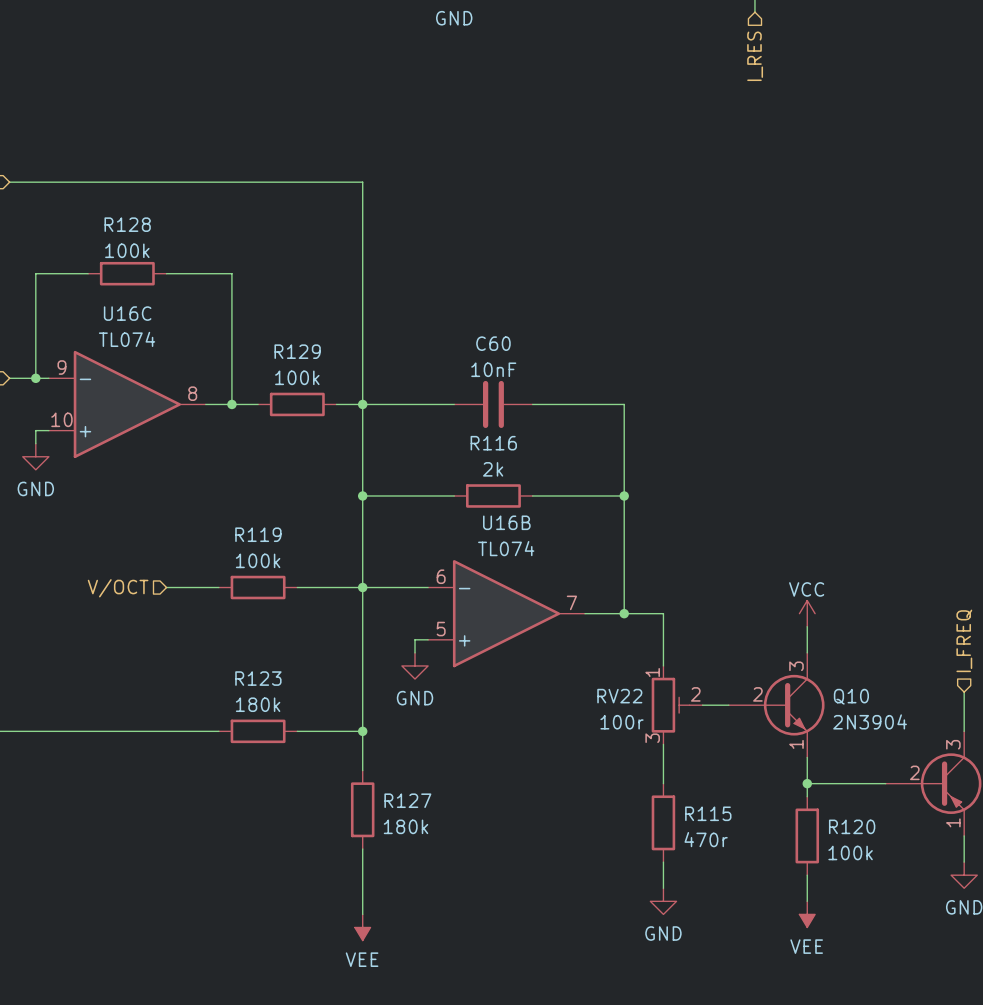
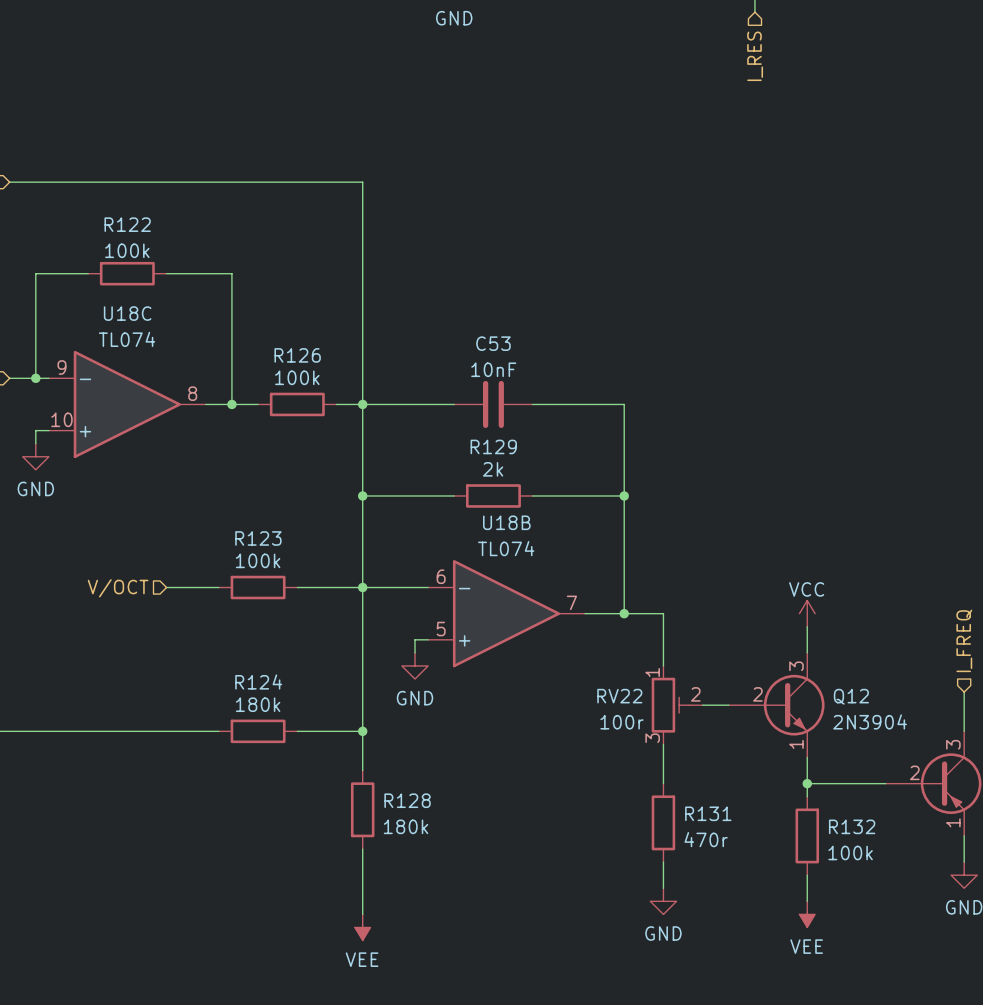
R128 name: R128 (127, 224) -> R122 (127, 224)
U16C name: U16C (127, 313) -> U18C (127, 313)
C60 name: C60 (493, 343) -> C53 (493, 343)
R129 name: R129 (297, 351) -> R126 (297, 355)
R116 name: R116 (493, 443) -> R129 (493, 446)
U16B name: U16B (506, 522) -> U18B (506, 522)
R119 name: R119 (258, 534) -> R123 (258, 538)
R123 name: R123 (258, 678) -> R124 (258, 682)
Q10 name: Q10 (851, 696) -> Q12 (851, 696)
R127 name: R127 (407, 800) -> R128 (407, 800)
R115 name: R115 (708, 813) -> R131 (708, 813)
R120 name: R120 (852, 826) -> R132 (852, 826)

